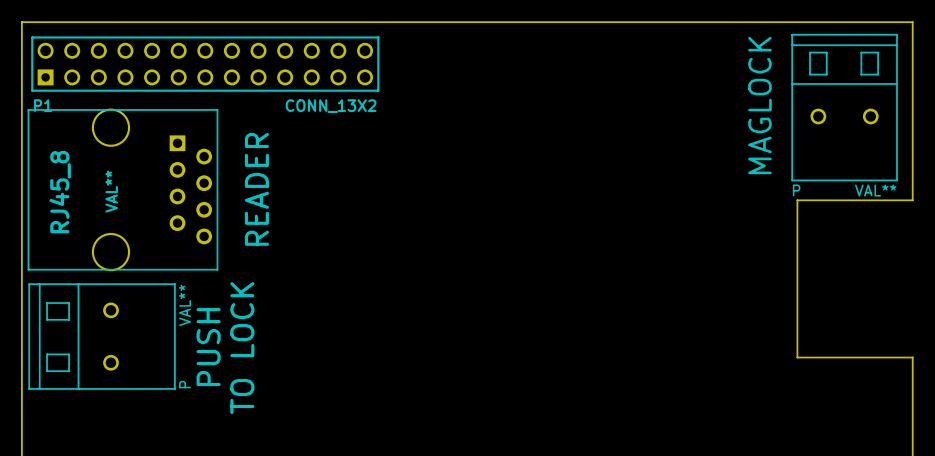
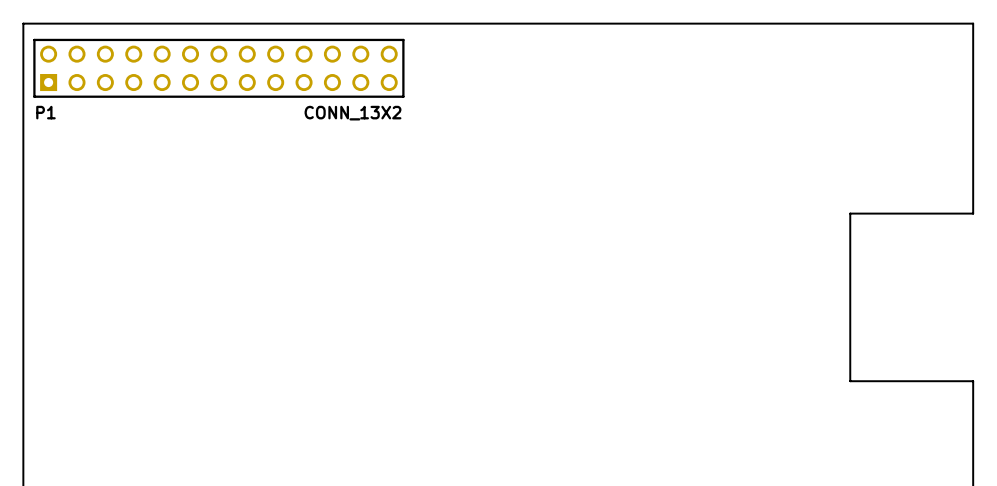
text: MAGLOCK (759, 105) -> none
P: VAL** (844, 107) -> none
RJ45_8: VAL** (122, 189) -> none
text: READER (256, 189) -> none
P: VAL** (102, 336) -> none
text: PUSH (208, 347) -> none
text: TO LOCK (242, 348) -> none

